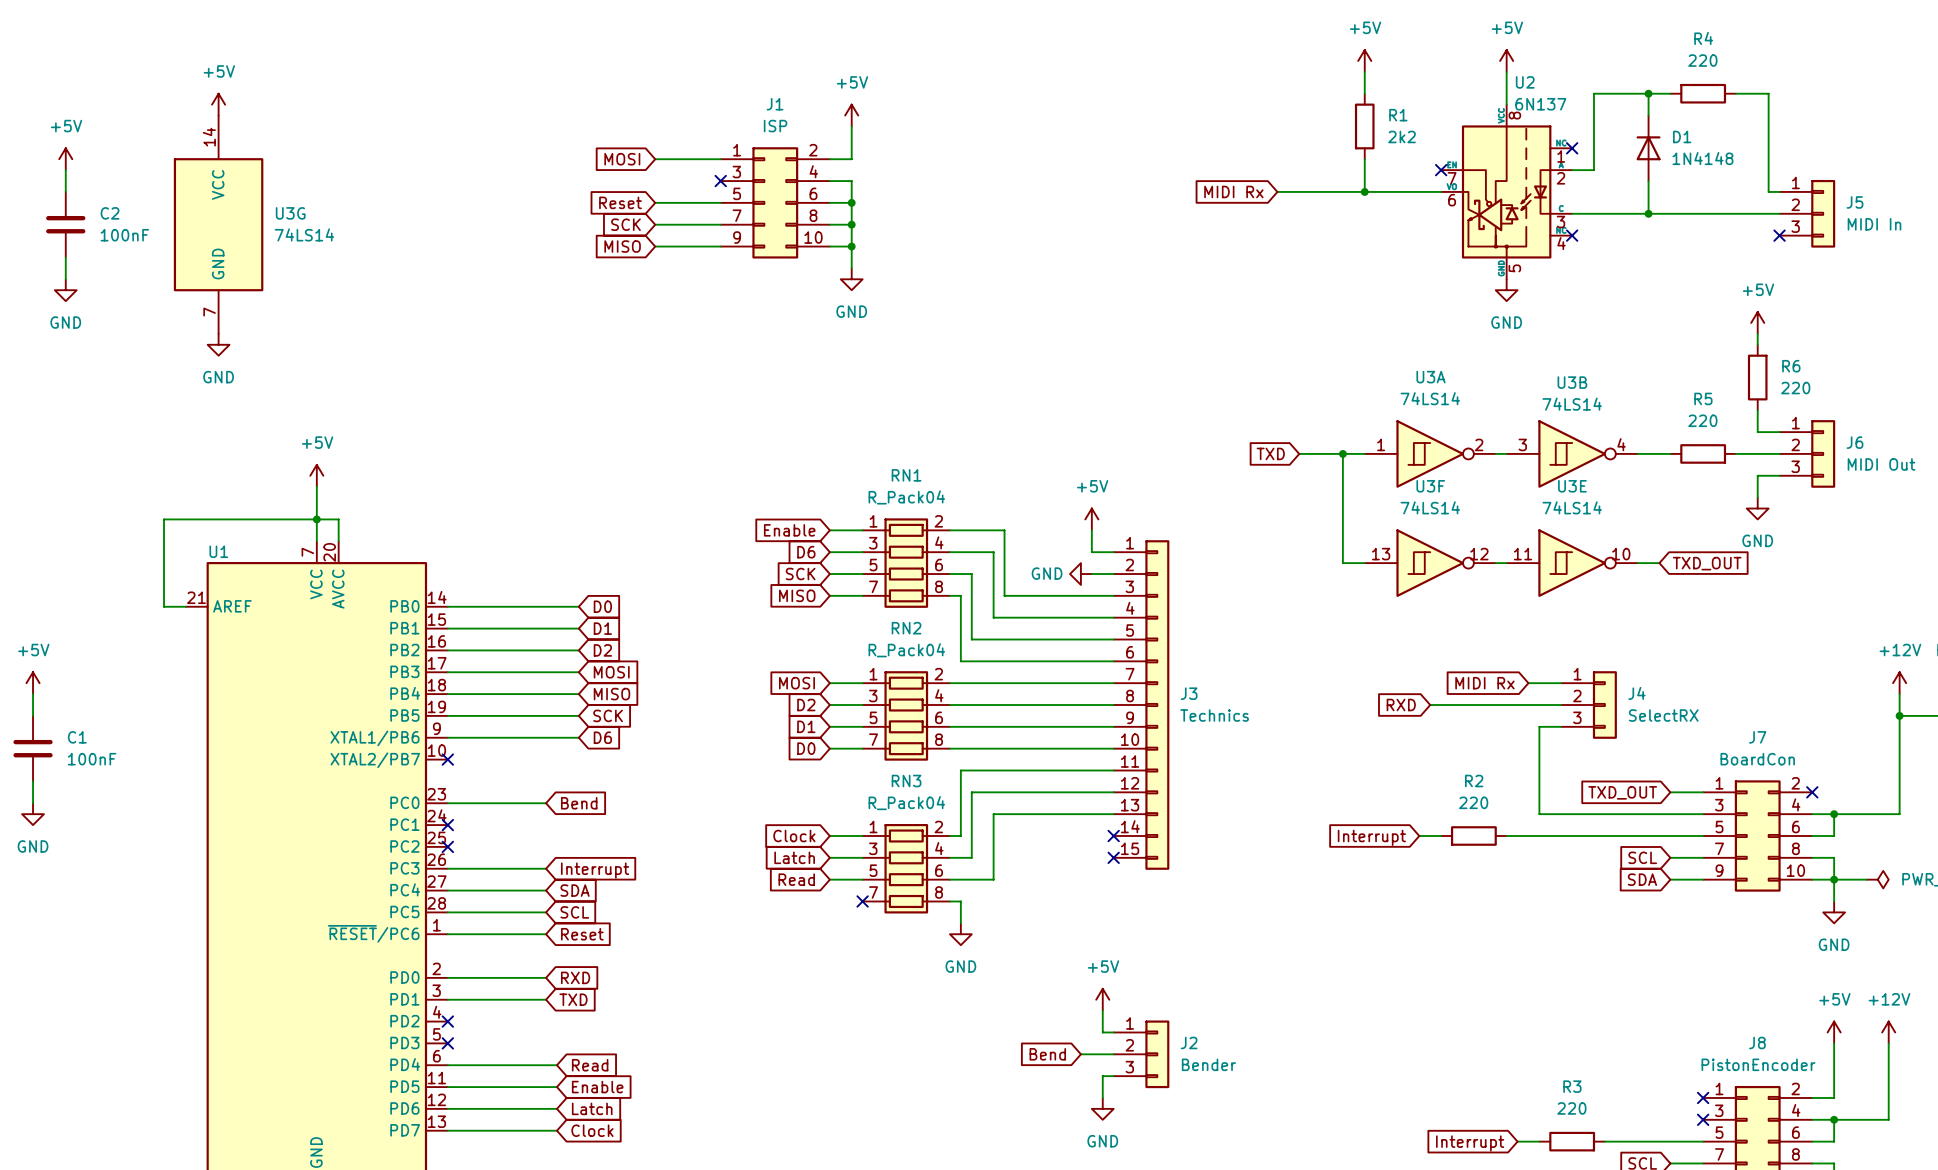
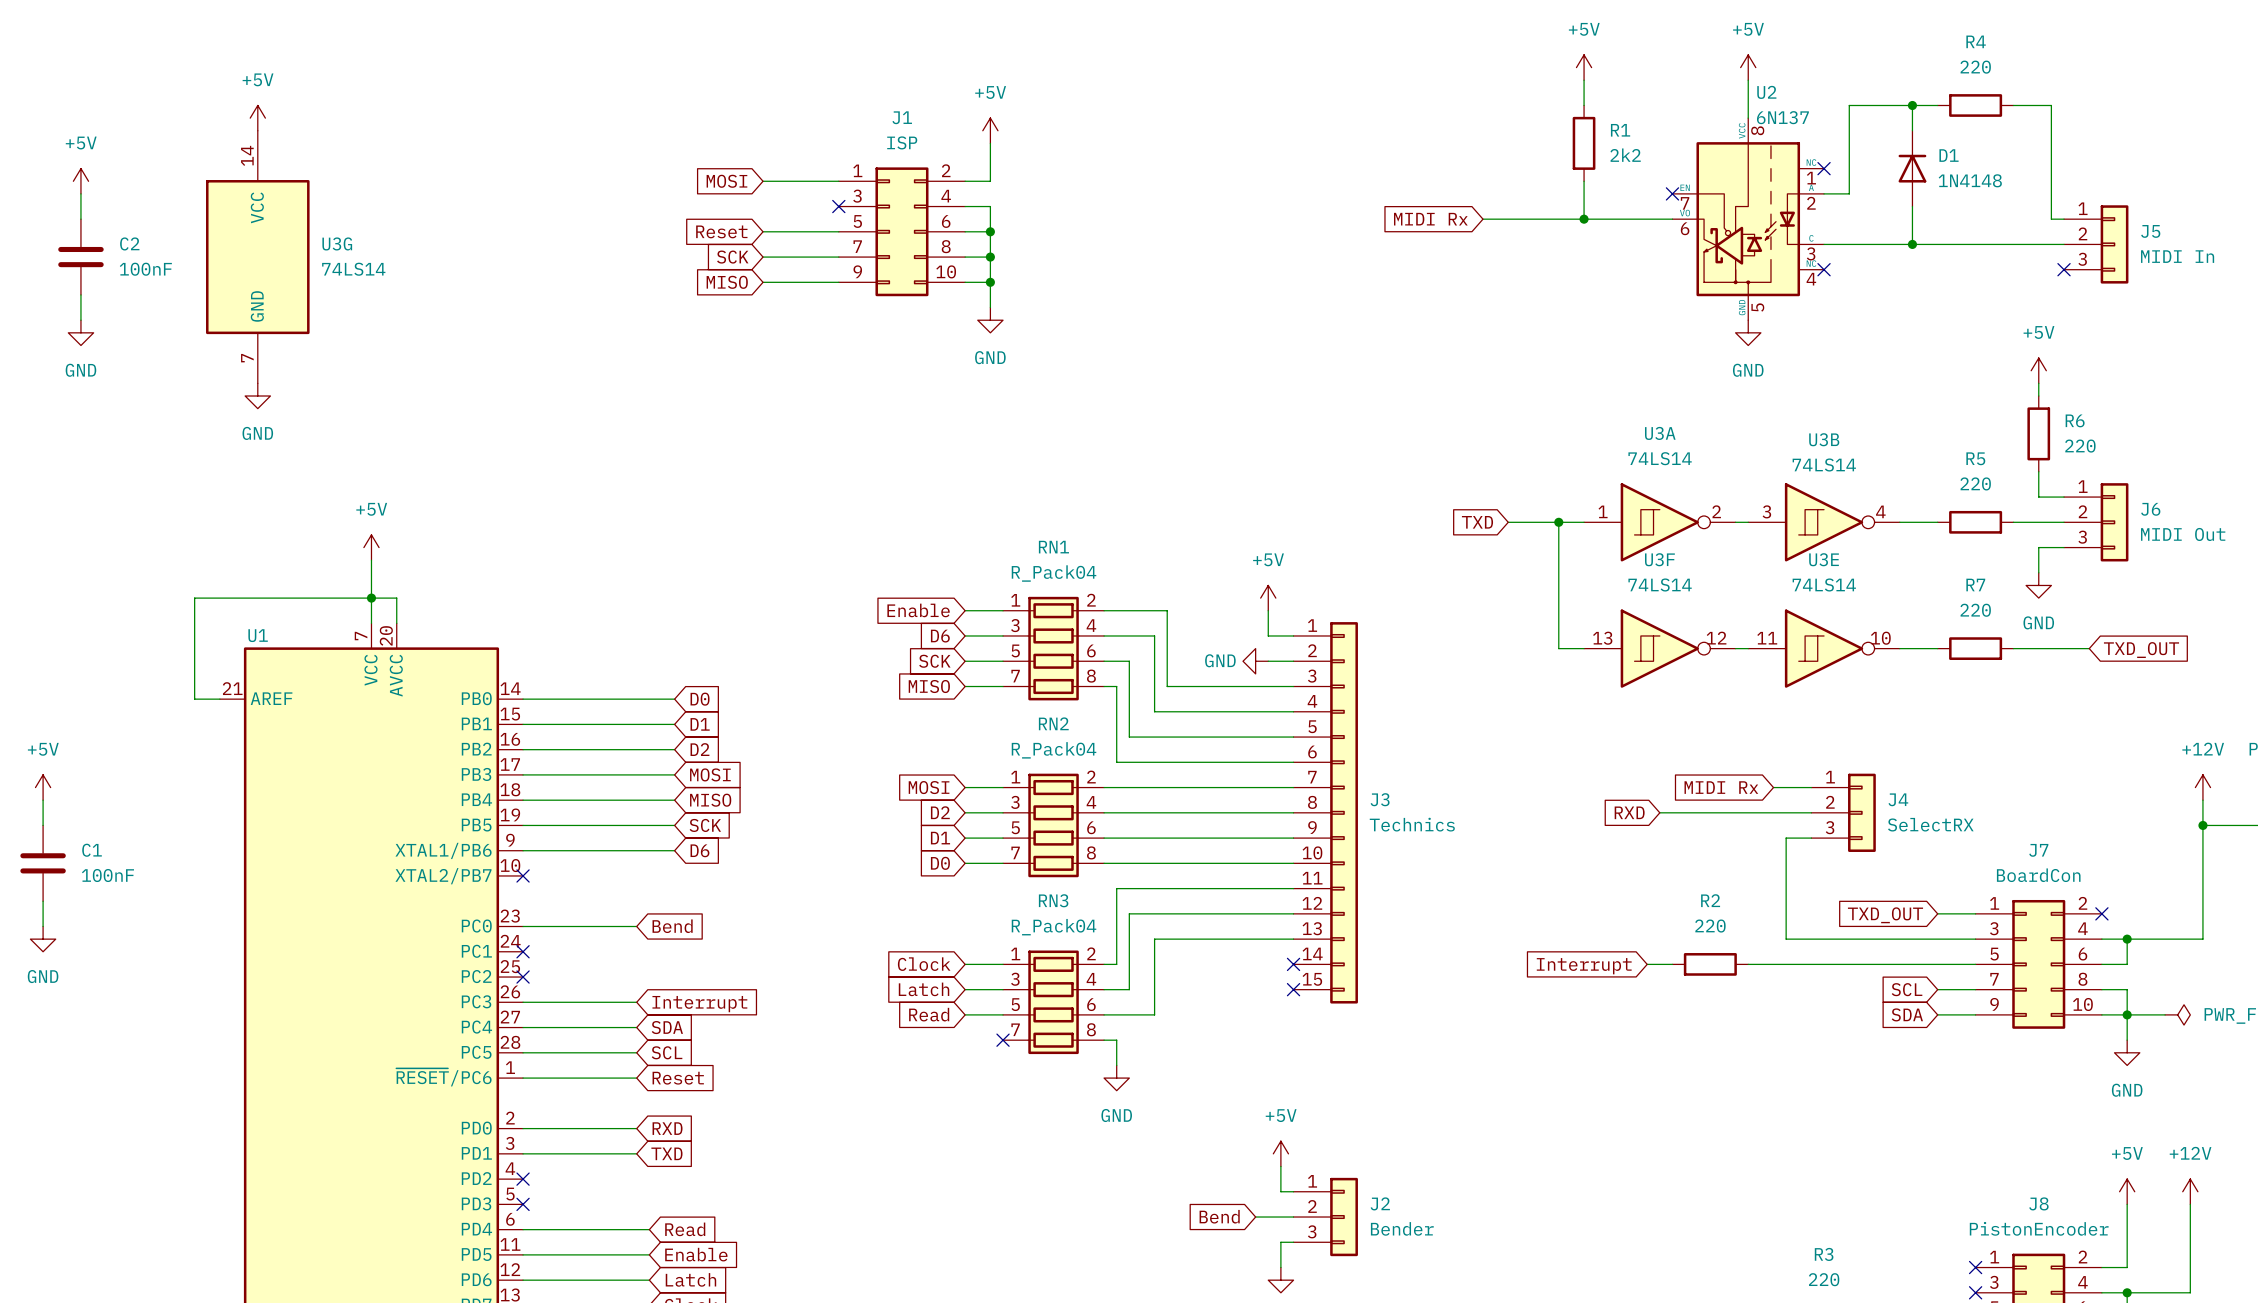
wire: none -> (1925, 648) (1937, 648)
R7: none -> 220 (1975, 648)
global label position: TXD_OUT (1707, 563) -> TXD_OUT (2141, 650)
wire: none -> (2013, 648) (2089, 648)

